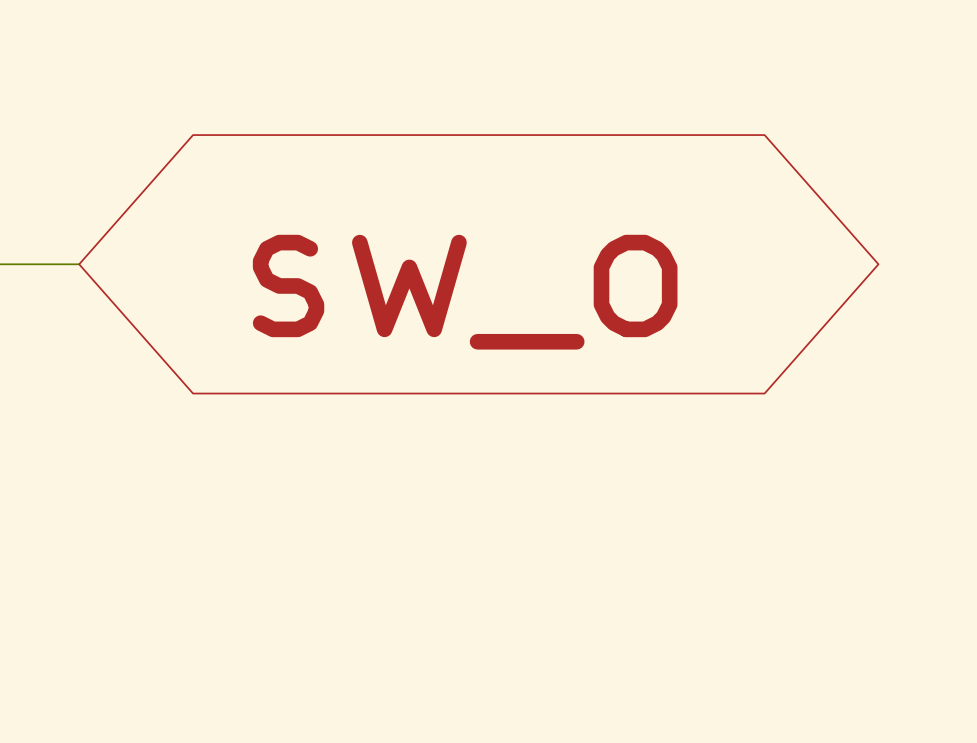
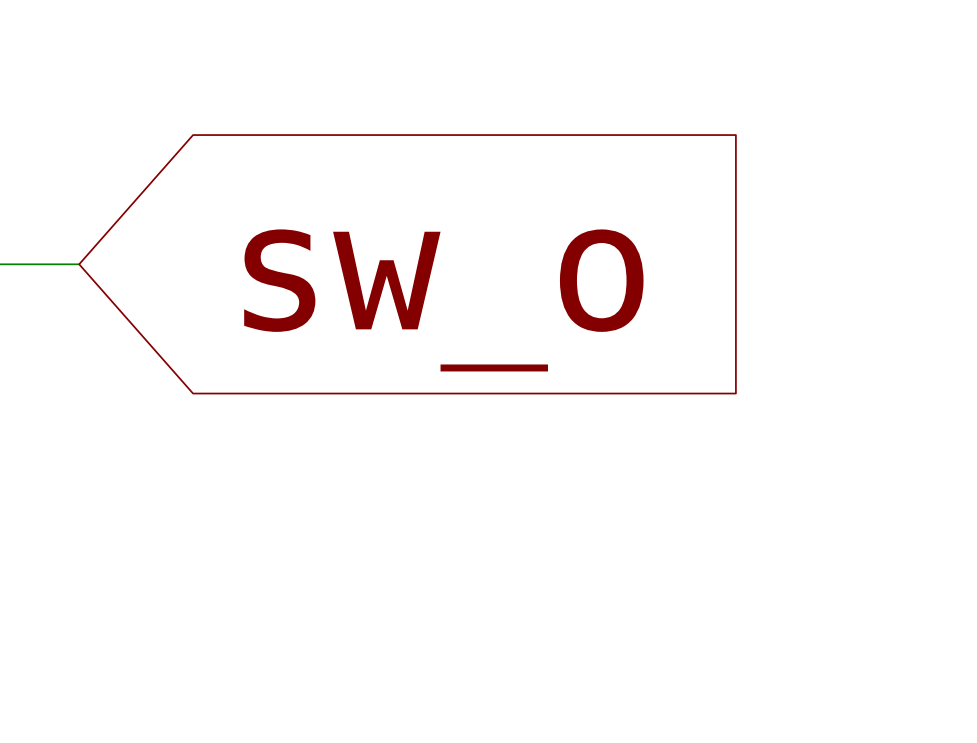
global label shape: bidirectional (465, 292) -> input (443, 300)

